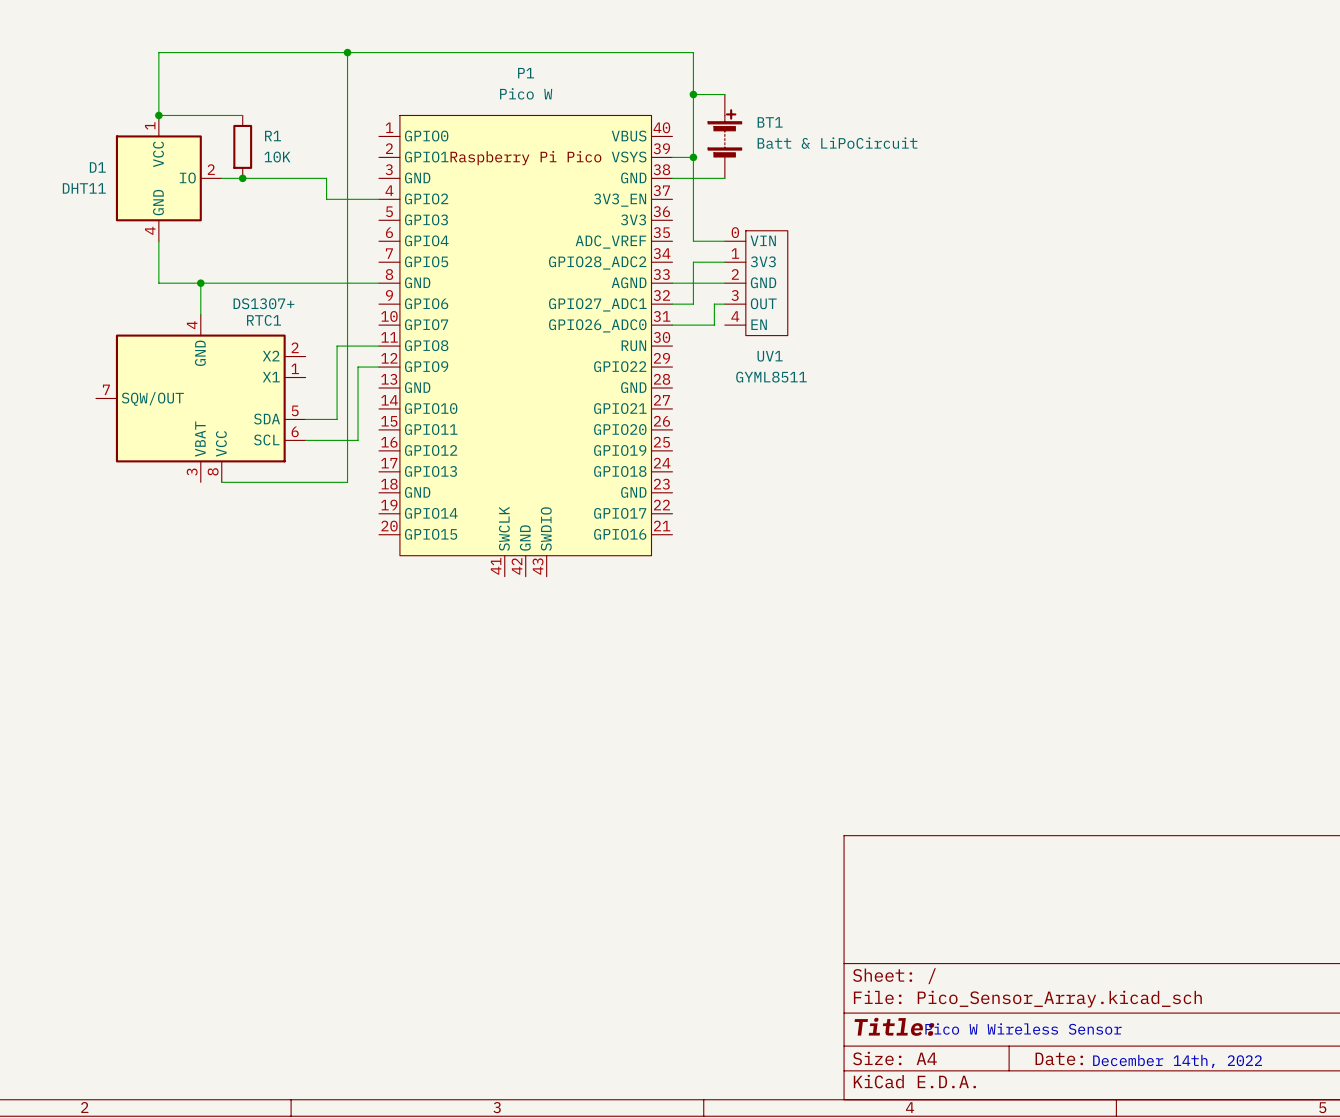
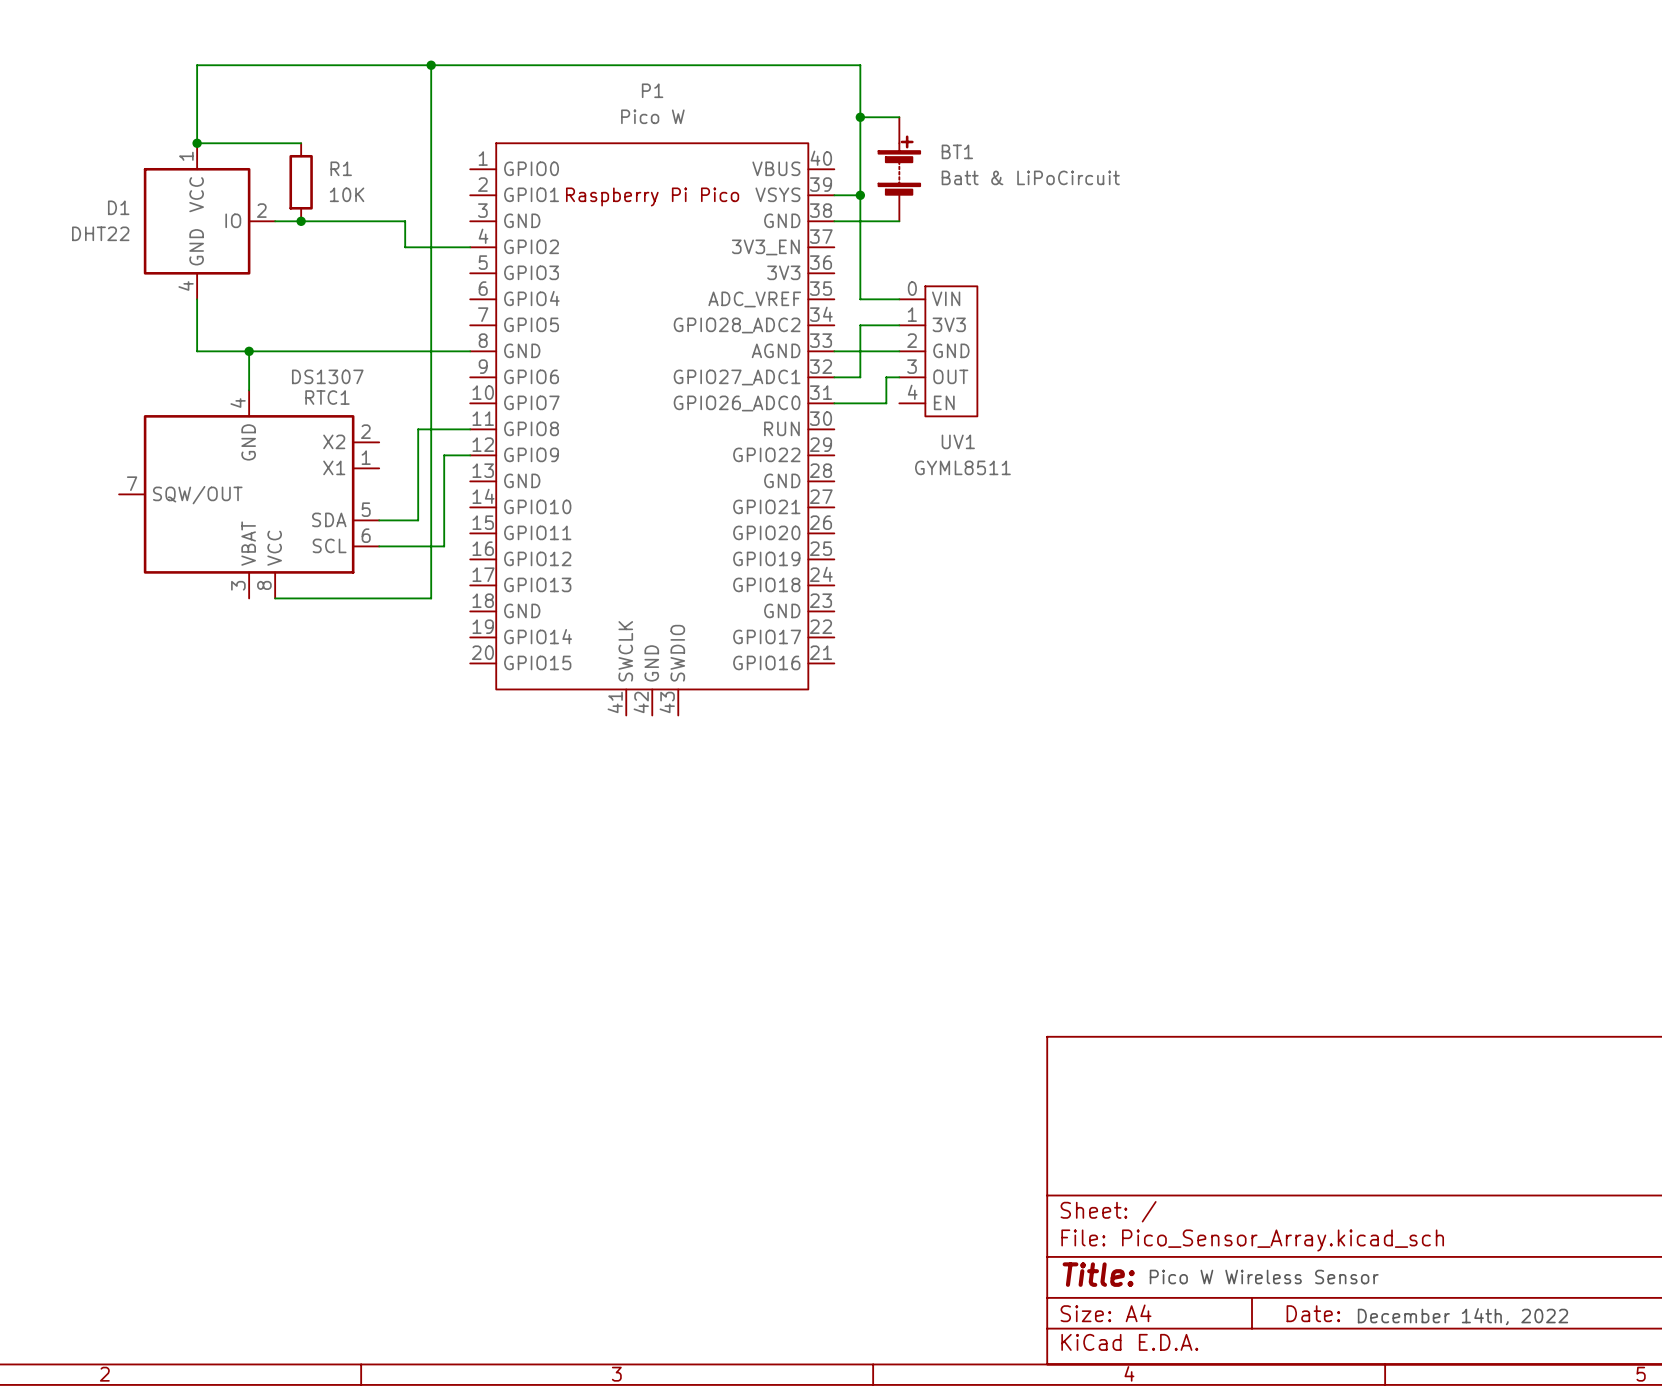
D1 value: DHT11 (84, 188) -> DHT22 (100, 233)
RTC1 value: DS1307+ (263, 303) -> DS1307 (327, 376)

